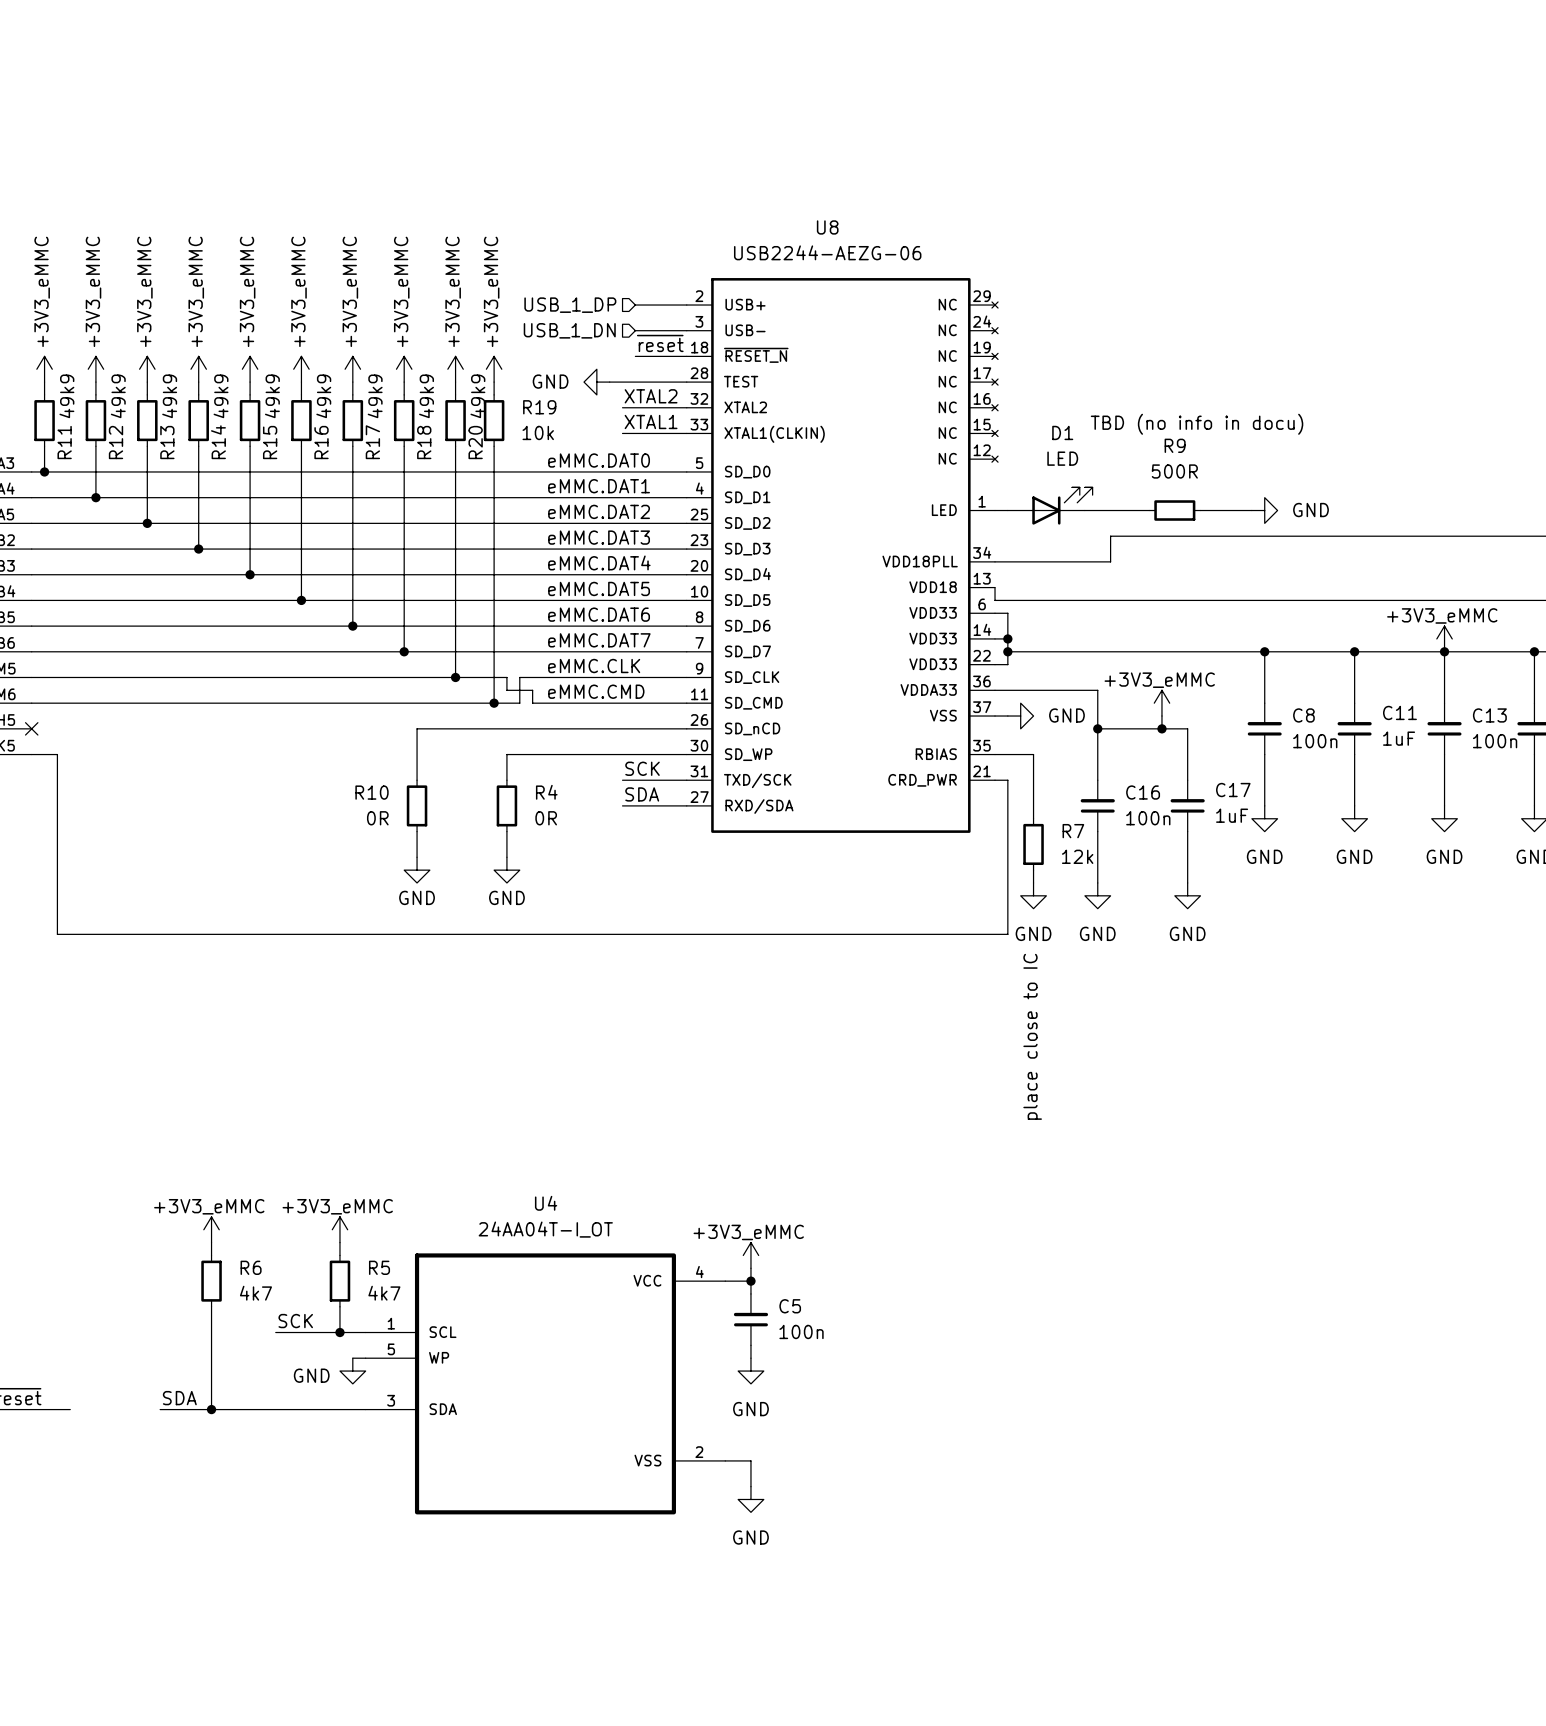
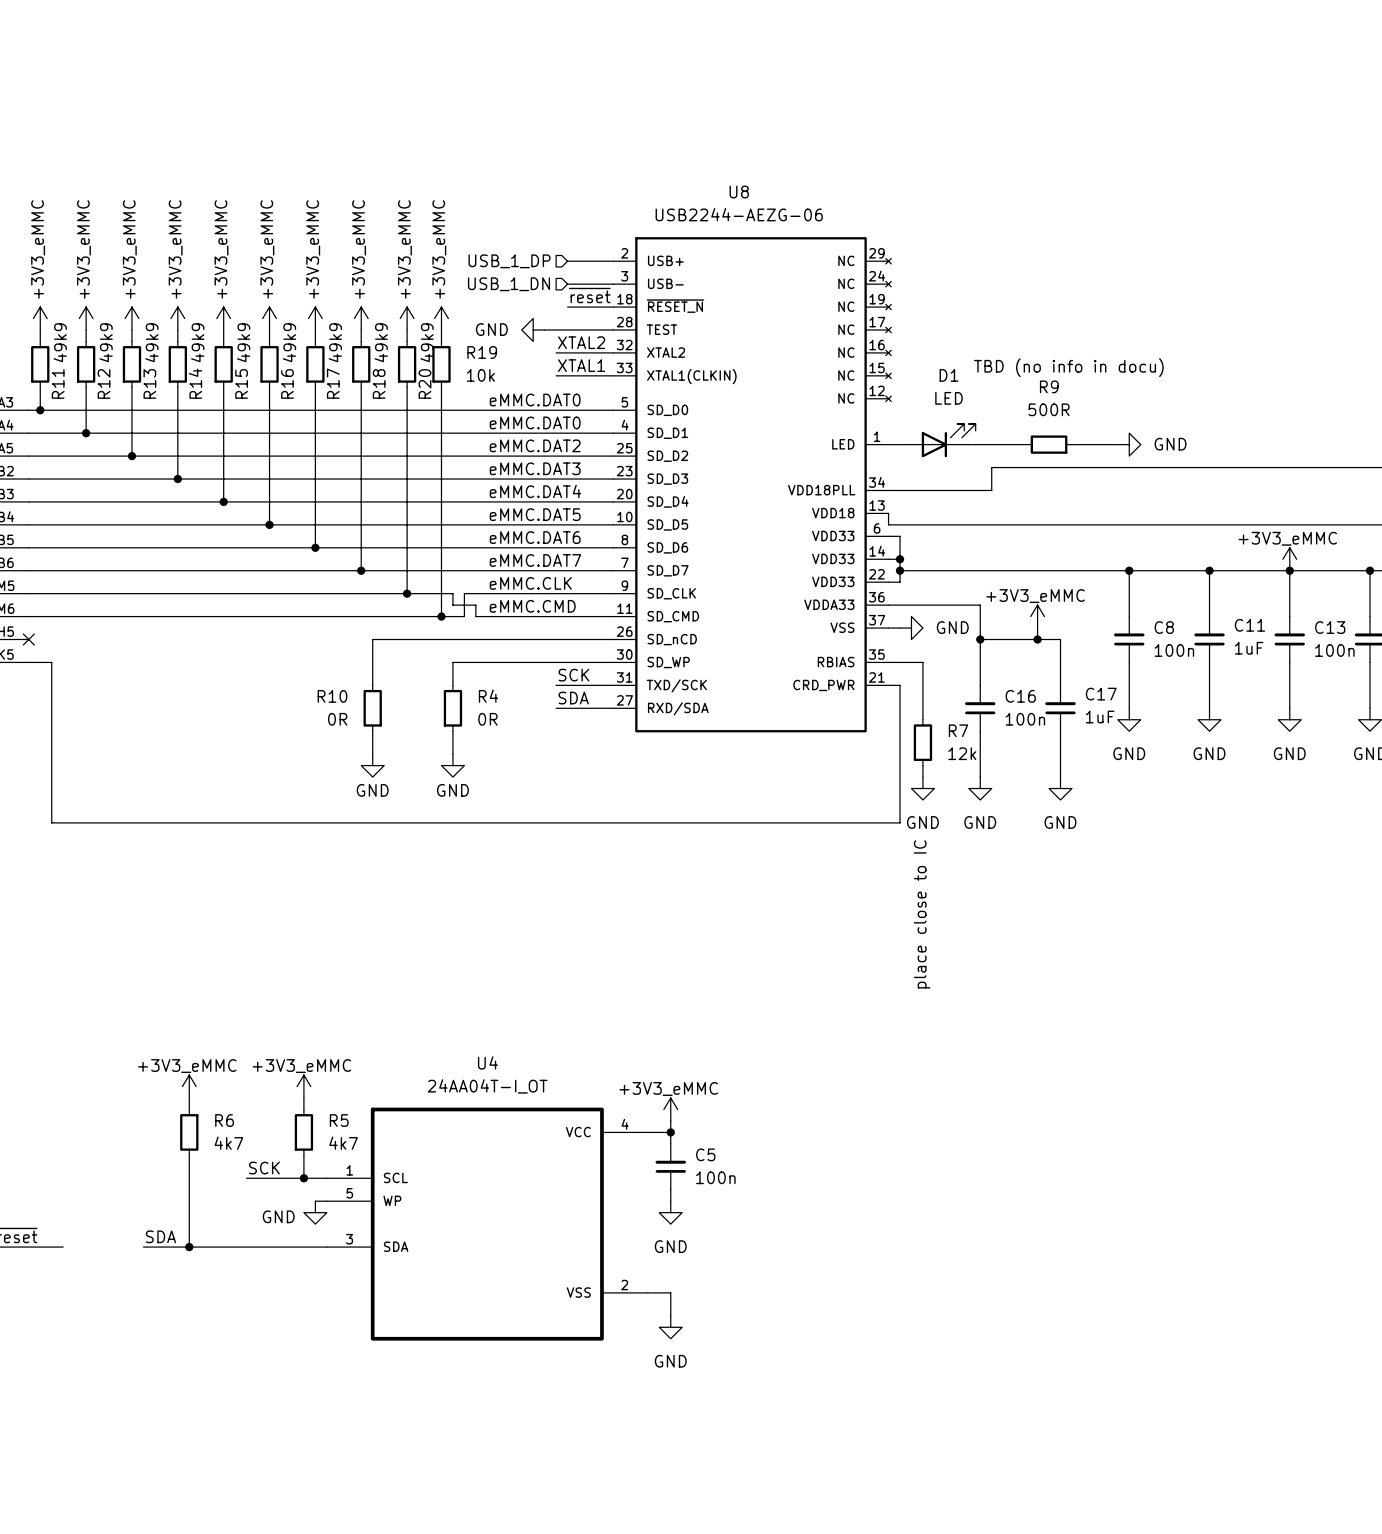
label: eMMC.DAT1 (599, 486) -> eMMC.DAT0 (535, 422)

